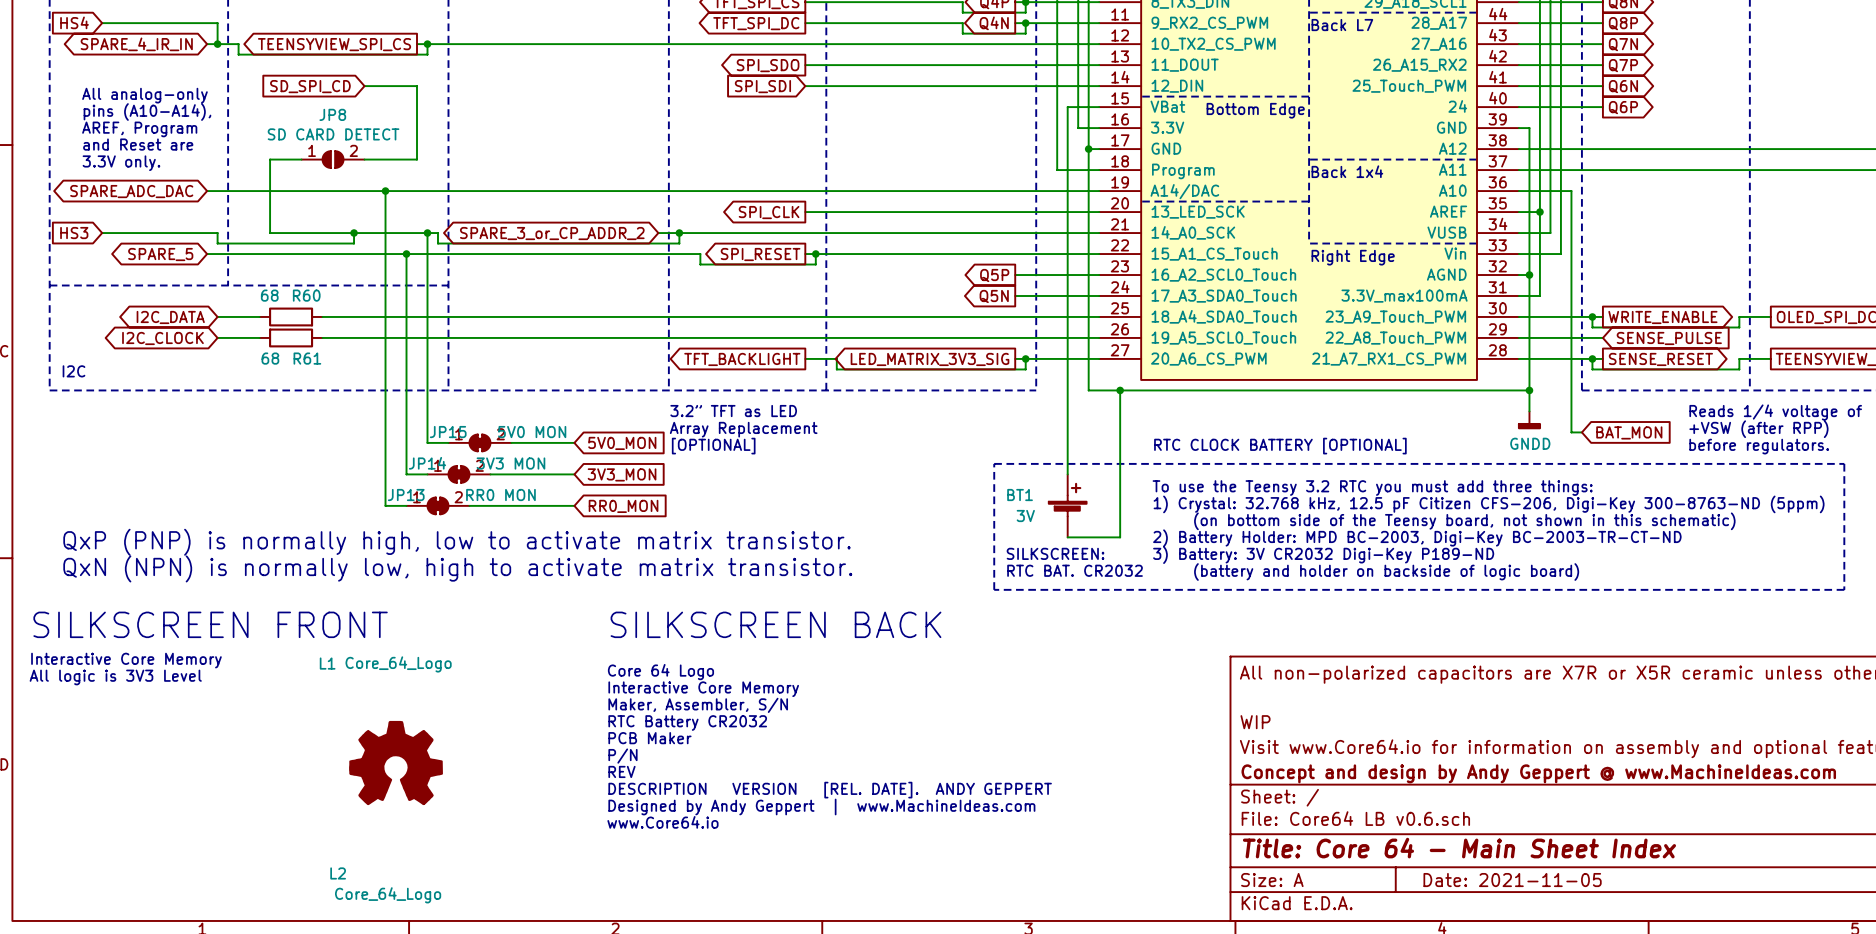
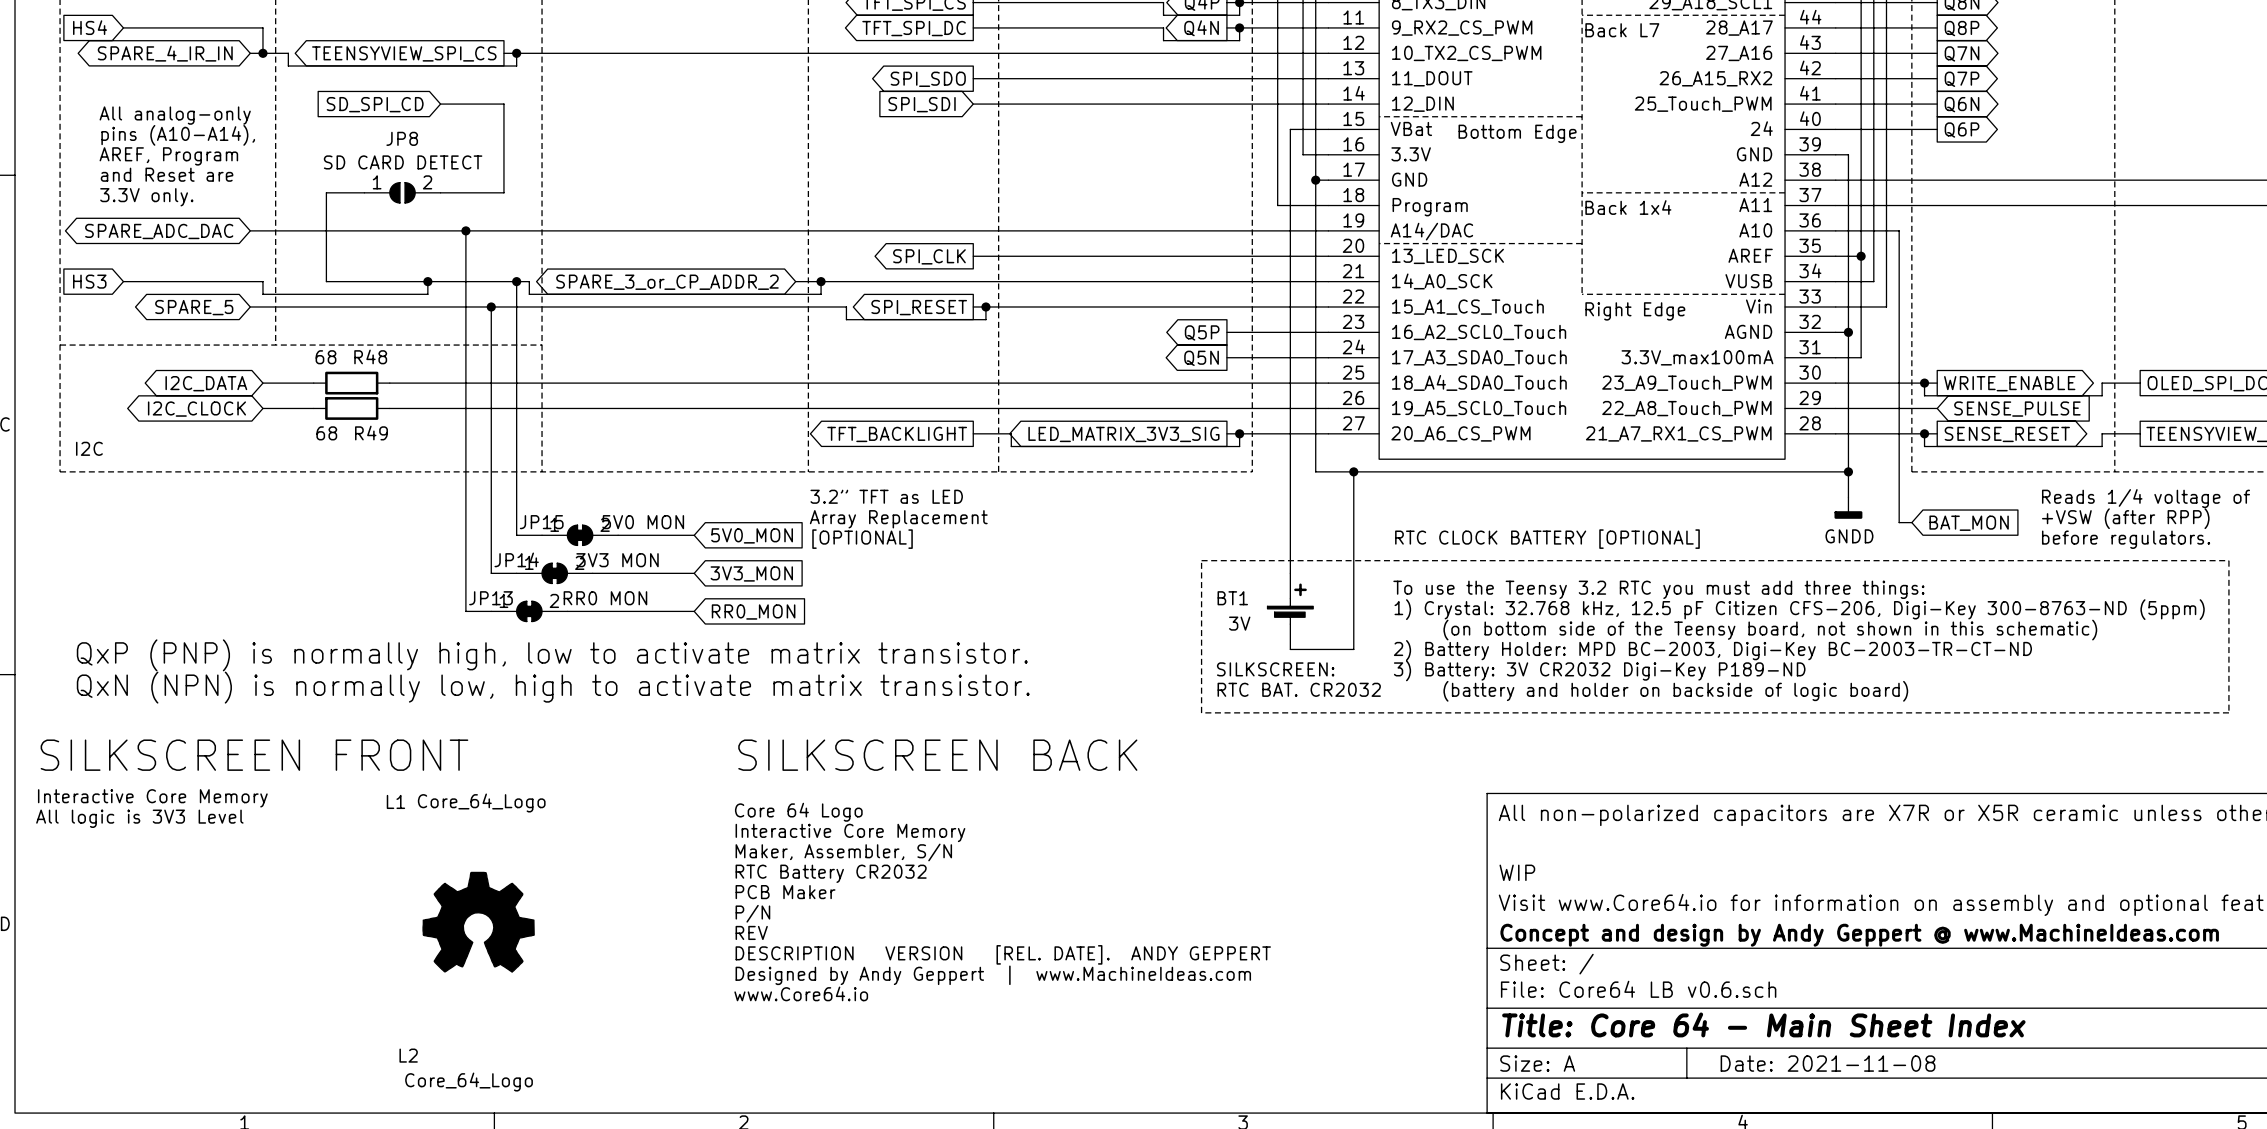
R60 name: R60 (306, 295) -> R48 (370, 356)
R61 name: R61 (307, 358) -> R49 (371, 433)
title block: Date: 2021-11-05 (1512, 880) -> Date: 2021-11-08 (1828, 1063)

